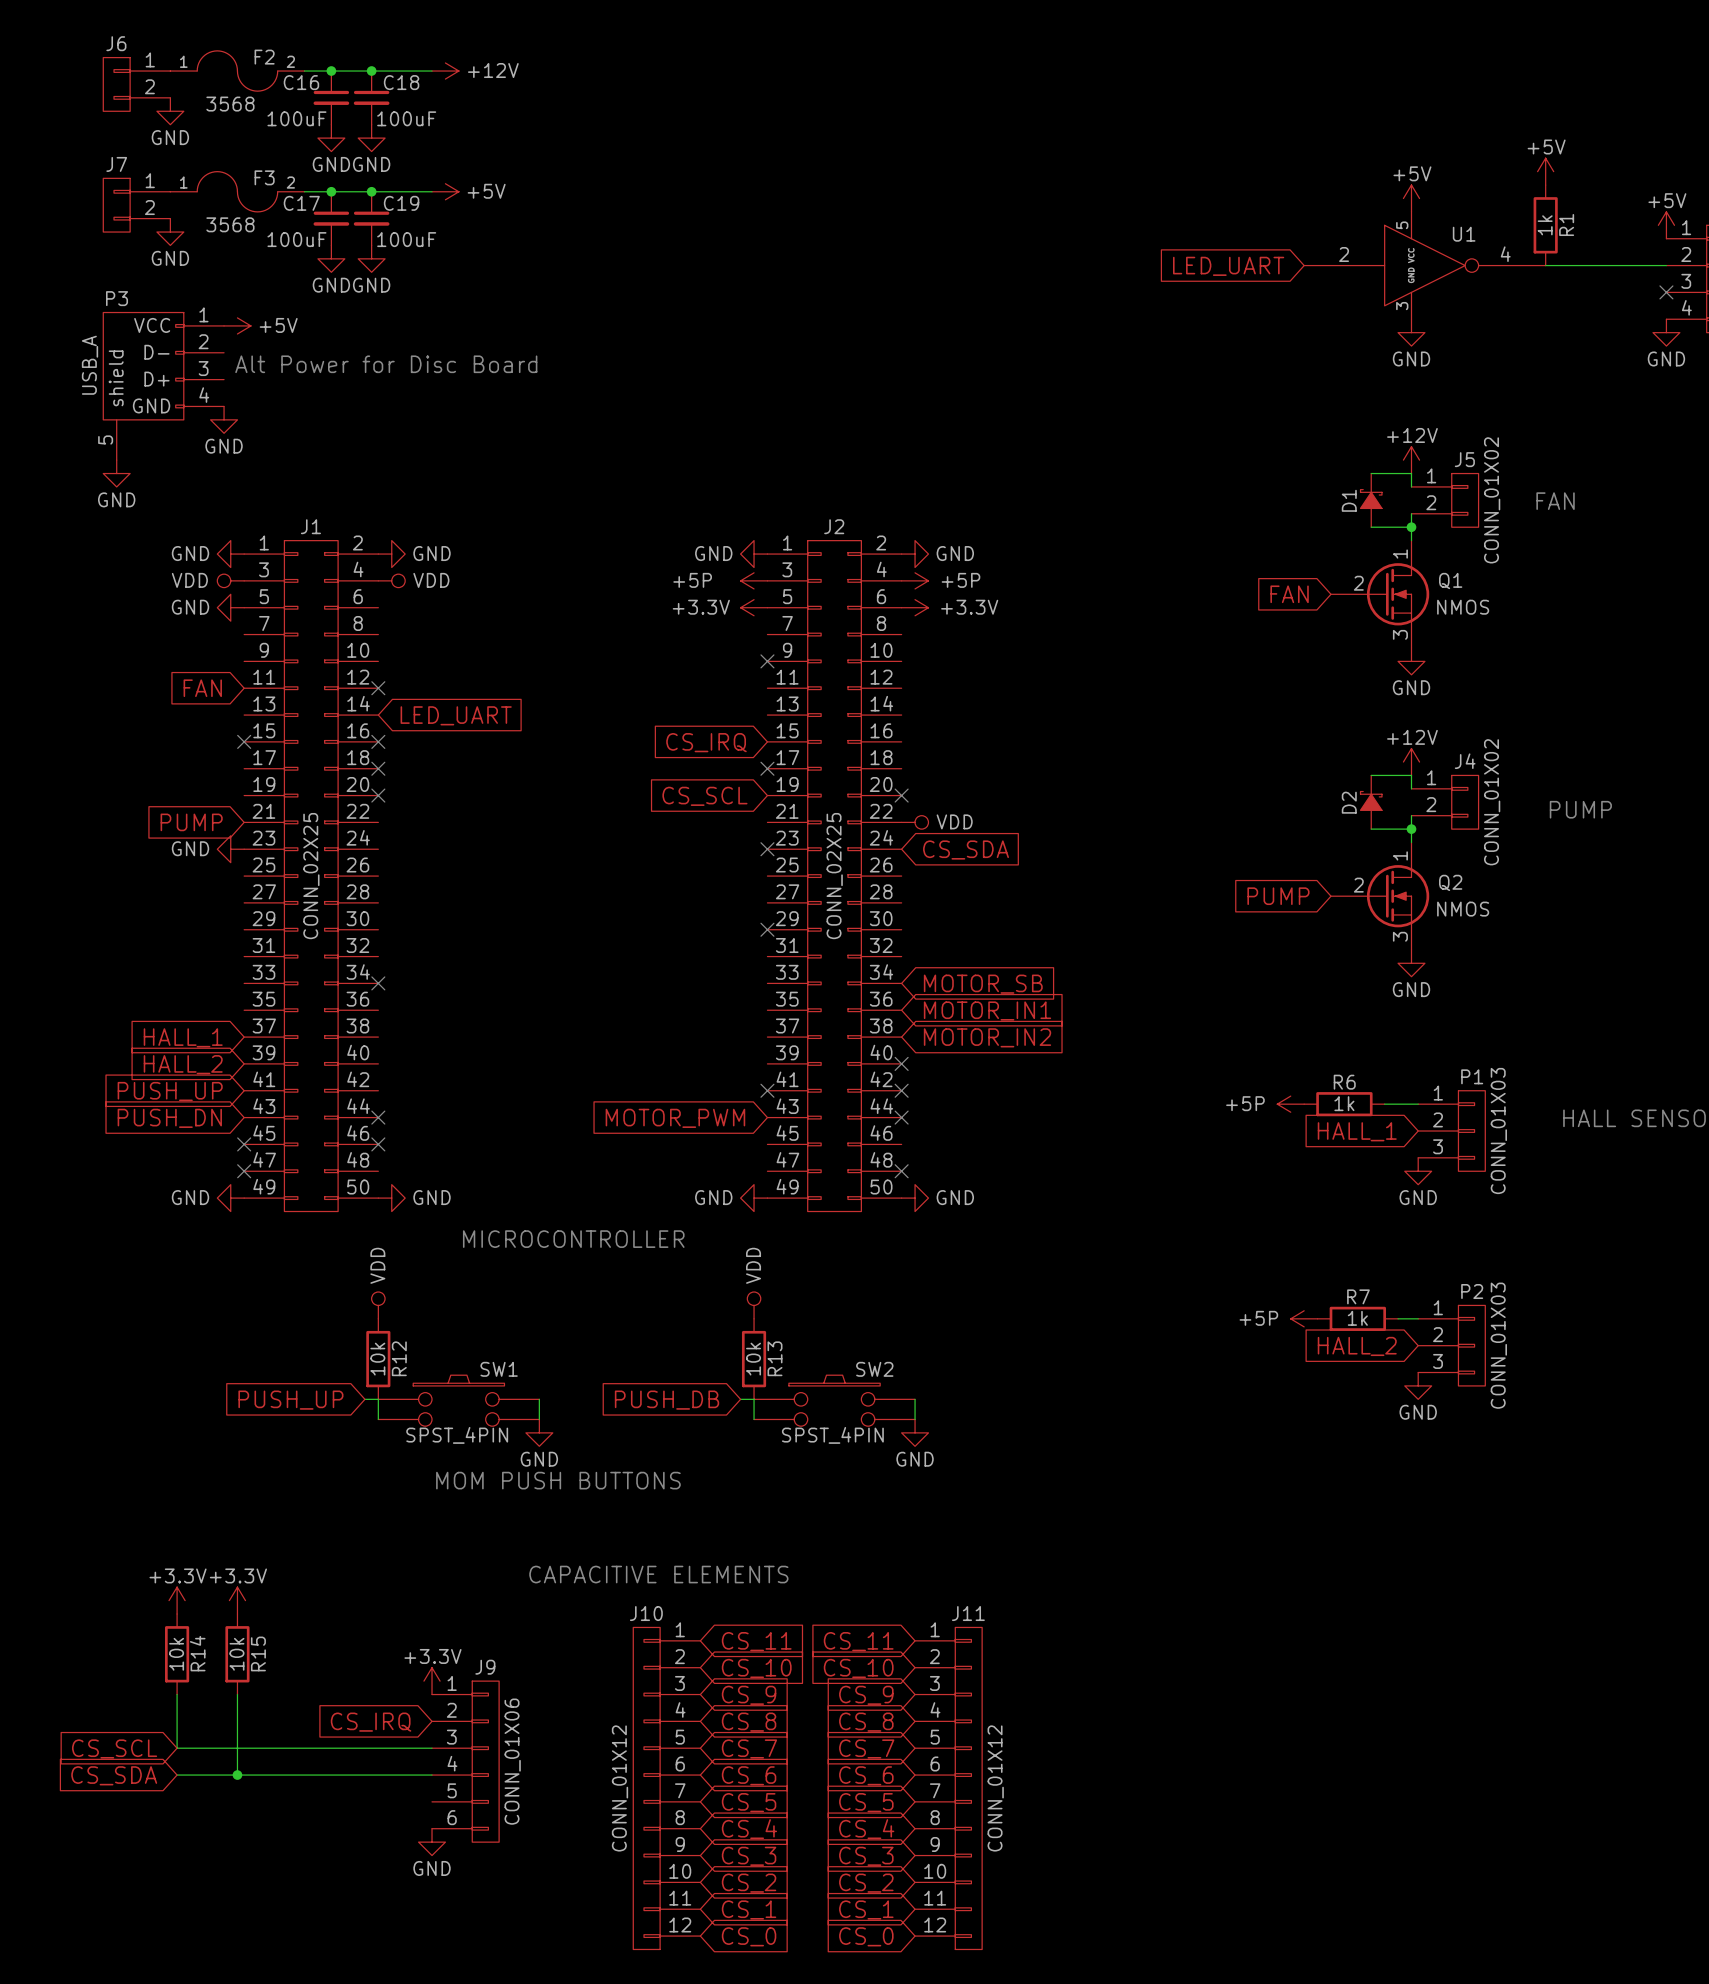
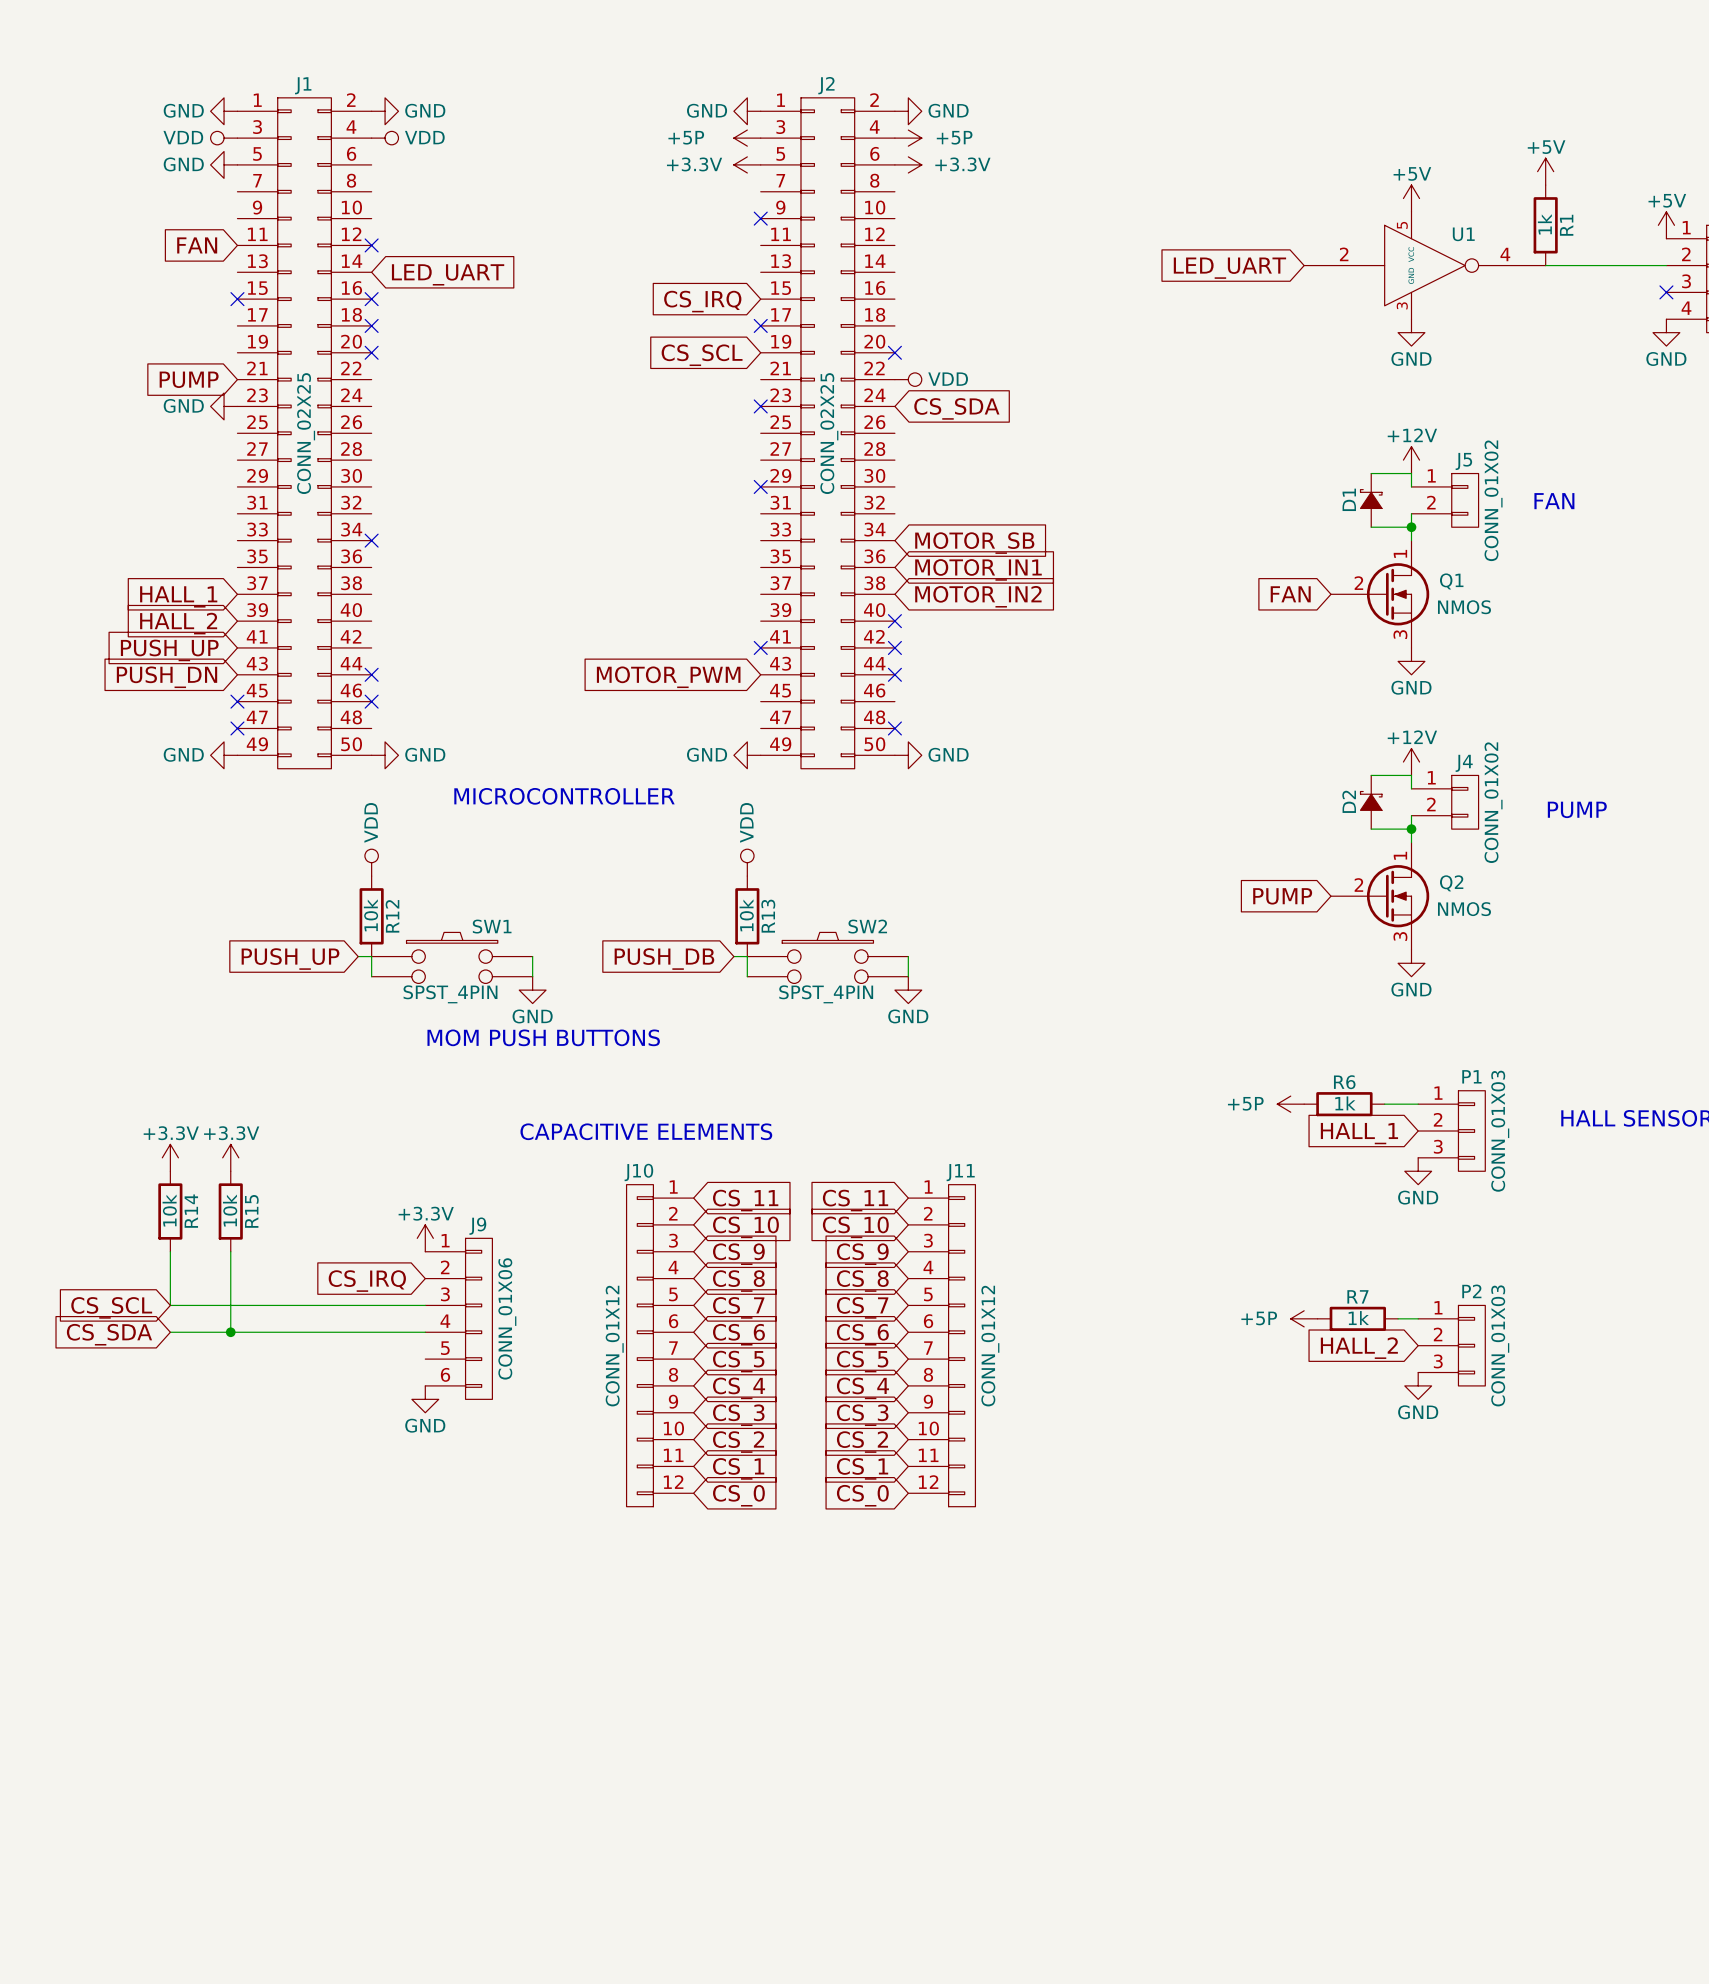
F2: 3568 (237, 71) -> none
wire: (304, 71) (432, 71) -> none
junction: (331, 71) -> none
junction: (371, 71) -> none
power symbol: +12V (445, 71) -> none
J6: (136, 84) -> none
C16: 100uF (331, 97) -> none
C18: 100uF (371, 97) -> none
power symbol: GND (170, 111) -> none
power symbol: none -> GND (224, 111)
power symbol: none -> GND (385, 111)
power symbol: none -> GND (747, 111)
power symbol: none -> GND (908, 111)
power symbol: none -> VDD (224, 138)
power symbol: GND (331, 138) -> none
power symbol: GND (371, 138) -> none
power symbol: none -> VDD (385, 138)
power symbol: none -> +5P (747, 138)
power symbol: none -> +5P (908, 138)
power symbol: none -> GND (224, 164)
power symbol: none -> +3.3V (747, 164)
power symbol: none -> +3.3V (908, 164)
F3: 3568 (237, 191) -> none
wire: (304, 191) (432, 191) -> none
junction: (331, 191) -> none
junction: (371, 191) -> none
power symbol: +5V (445, 191) -> none
J7: (136, 205) -> none
C17: 100uF (331, 218) -> none
C19: 100uF (371, 218) -> none
no-connect mark: none -> (760, 218)
power symbol: GND (170, 232) -> none
global label: none -> FAN (197, 245)
no-connect mark: none -> (371, 245)
power symbol: GND (331, 258) -> none
power symbol: GND (371, 258) -> none
global label: none -> LED_UART (448, 274)
no-connect mark: none -> (237, 299)
no-connect mark: none -> (371, 299)
global label: none -> CS_IRQ (702, 301)
power symbol: +5V (237, 325) -> none
no-connect mark: none -> (371, 325)
no-connect mark: none -> (760, 325)
no-connect mark: none -> (371, 352)
no-connect mark: none -> (894, 352)
global label: none -> CS_SCL (702, 355)
text: Alt Power for Disc Board (386, 364) -> none
global label: none -> PUMP (189, 379)
power symbol: none -> VDD (908, 379)
P3: USB_A (163, 386) -> none
no-connect mark: none -> (760, 406)
global label: none -> CS_SDA (956, 408)
power symbol rotation: 0° (224, 419) -> 90° clockwise (224, 406)
power symbol: GND (116, 473) -> none
no-connect mark: none -> (760, 486)
no-connect mark: none -> (371, 540)
global label: none -> MOTOR_SB (974, 543)
power symbol: GND (230, 554) -> none
power symbol: GND (391, 554) -> none
power symbol: GND (754, 554) -> none
power symbol: GND (915, 554) -> none
global label: none -> MOTOR_IN1 (978, 569)
power symbol: VDD (230, 580) -> none
power symbol: VDD (391, 580) -> none
power symbol: +5P (754, 580) -> none
power symbol: +5P (915, 580) -> none
global label: none -> HALL_1 (178, 596)
global label: none -> MOTOR_IN2 (978, 596)
power symbol: GND (230, 607) -> none
power symbol: +3.3V (754, 607) -> none
power symbol: +3.3V (915, 607) -> none
global label: none -> HALL_2 (178, 623)
no-connect mark: none -> (894, 621)
no-connect mark: none -> (894, 647)
global label: none -> PUSH_UP (169, 650)
no-connect mark position: (767, 661) -> (760, 647)
no-connect mark: none -> (371, 674)
no-connect mark: none -> (894, 674)
global label: none -> PUSH_DN (167, 677)
global label: none -> MOTOR_PWM (668, 677)
global label: FAN (202, 688) -> none
no-connect mark: (378, 688) -> none
no-connect mark: none -> (237, 701)
no-connect mark: none -> (371, 701)
global label: LED_UART (456, 715) -> none
no-connect mark: none -> (894, 728)
no-connect mark position: (244, 741) -> (237, 728)
no-connect mark: (378, 741) -> none
global label: CS_IRQ (706, 742) -> none
power symbol: none -> GND (224, 755)
power symbol: none -> GND (385, 755)
power symbol: none -> GND (747, 755)
power symbol: none -> GND (908, 755)
no-connect mark: (378, 768) -> none
no-connect mark: (767, 768) -> none
no-connect mark: (378, 795) -> none
no-connect mark: (901, 795) -> none
text: none -> MICROCONTROLLER (564, 796)
global label: CS_SCL (704, 796) -> none
global label: PUMP (191, 822) -> none
power symbol rotation: 0° (915, 822) -> 90° counterclockwise (747, 862)
power symbol position: VDD (915, 822) -> VDD (747, 862)
power symbol: GND (230, 849) -> none
no-connect mark: (767, 849) -> none
global label: CS_SDA (966, 850) -> none
power symbol: none -> VDD (371, 862)
J1 position: (311, 876) -> (304, 433)
J2 position: (834, 876) -> (827, 433)
no-connect mark: (767, 929) -> none
wire: none -> (358, 956) (371, 956) (371, 976)
wire: none -> (532, 956) (532, 976)
wire: none -> (733, 956) (747, 956) (747, 976)
wire: none -> (908, 956) (908, 976)
global label: none -> PUSH_DB (664, 959)
no-connect mark: (378, 983) -> none
global label: MOTOR_SB (983, 984) -> none
power symbol: none -> GND (532, 990)
power symbol: none -> GND (908, 990)
global label: MOTOR_IN1 (987, 1011) -> none
global label: HALL_1 (183, 1037) -> none
text: none -> MOM PUSH BUTTONS (543, 1037)
global label: MOTOR_IN2 (987, 1037) -> none
no-connect mark: (901, 1063) -> none
global label: HALL_2 (183, 1064) -> none
no-connect mark: (767, 1090) -> none
no-connect mark: (901, 1090) -> none
global label position: PUSH_UP (170, 1091) -> PUSH_UP (290, 959)
no-connect mark: (378, 1117) -> none
no-connect mark: (901, 1117) -> none
global label: PUSH_DN (169, 1118) -> none
global label: MOTOR_PWM (675, 1118) -> none
text: none -> CAPACITIVE ELEMENTS (646, 1131)
no-connect mark: (244, 1144) -> none
no-connect mark: (378, 1144) -> none
power symbol: none -> +3.3V (170, 1157)
power symbol: none -> +3.3V (230, 1157)
no-connect mark: (244, 1171) -> none
no-connect mark: (901, 1171) -> none
power symbol: GND (230, 1198) -> none
power symbol: GND (391, 1198) -> none
global label: none -> CS_11 (745, 1200)
power symbol: GND (754, 1198) -> none
global label: none -> CS_11 (855, 1200)
power symbol: GND (915, 1198) -> none
global label: none -> CS_10 (745, 1227)
global label: none -> CS_10 (855, 1227)
power symbol: none -> +3.3V (425, 1238)
text: MICROCONTROLLER (573, 1239) -> none
wire: none -> (170, 1251) (170, 1305) (425, 1305)
wire: none -> (230, 1251) (230, 1332)
global label: none -> CS_9 (738, 1254)
global label: none -> CS_9 (862, 1254)
global label: none -> CS_IRQ (367, 1281)
global label: none -> CS_8 (738, 1281)
global label: none -> CS_8 (862, 1281)
power symbol: VDD (378, 1305) -> none
power symbol: VDD (754, 1305) -> none
global label: none -> CS_SCL (111, 1307)
global label: none -> CS_7 (738, 1307)
global label: none -> CS_7 (862, 1307)
wire: none -> (170, 1332) (425, 1332)
junction: none -> (230, 1332)
global label: none -> CS_SDA (109, 1334)
global label: none -> CS_6 (738, 1334)
global label: none -> CS_6 (862, 1334)
R12 position: (378, 1359) -> (371, 916)
global label: none -> CS_5 (738, 1361)
R13 position: (754, 1359) -> (747, 916)
global label: none -> CS_5 (862, 1361)
global label: none -> CS_4 (739, 1388)
global label: none -> CS_4 (862, 1388)
wire: (364, 1399) (378, 1399) (378, 1419) -> none
power symbol: none -> GND (425, 1399)
wire: (539, 1399) (539, 1419) -> none
wire: (740, 1399) (754, 1399) (754, 1419) -> none
wire: (915, 1399) (915, 1419) -> none
global label: PUSH_UP (290, 1400) -> none
SW1 position: (458, 1400) -> (452, 957)
global label: PUSH_DB (667, 1400) -> none
SW2 position: (834, 1400) -> (827, 957)
global label: none -> CS_3 (738, 1415)
global label: none -> CS_3 (862, 1415)
power symbol: GND (539, 1432) -> none
power symbol: GND (915, 1432) -> none
global label: none -> CS_2 (738, 1442)
global label: none -> CS_2 (862, 1442)
global label: none -> CS_1 (738, 1468)
global label: none -> CS_1 (862, 1468)
text: MOM PUSH BUTTONS (558, 1480) -> none
global label: none -> CS_0 (738, 1495)
global label: none -> CS_0 (862, 1495)
text: CAPACITIVE ELEMENTS (658, 1574) -> none
power symbol: +3.3V (177, 1600) -> none
power symbol: +3.3V (237, 1600) -> none
global label: CS_11 (756, 1641) -> none
global label: CS_11 (858, 1641) -> none
R14 position: (177, 1654) -> (170, 1211)
R15 position: (237, 1654) -> (230, 1211)
global label: CS_10 (756, 1668) -> none
global label: CS_10 (858, 1668) -> none
power symbol: +3.3V (432, 1681) -> none
wire: (177, 1694) (177, 1748) (432, 1748) -> none
wire: (237, 1694) (237, 1775) -> none
global label: CS_9 (749, 1695) -> none
global label: CS_9 (866, 1695) -> none
global label: CS_IRQ (371, 1722) -> none
global label: CS_8 (749, 1722) -> none
global label: CS_8 (866, 1722) -> none
global label: CS_SCL (114, 1748) -> none
global label: CS_7 (749, 1748) -> none
global label: CS_7 (866, 1748) -> none
J9 position: (465, 1761) -> (458, 1318)
global label: CS_SDA (114, 1775) -> none
wire: (177, 1775) (432, 1775) -> none
junction: (237, 1775) -> none
global label: CS_6 (749, 1775) -> none
global label: CS_6 (866, 1775) -> none
J10 position: (666, 1788) -> (660, 1345)
J11 position: (948, 1788) -> (941, 1345)
global label: CS_5 (749, 1802) -> none
global label: CS_5 (866, 1802) -> none
global label: CS_4 (749, 1829) -> none
global label: CS_4 (866, 1829) -> none
power symbol: GND (432, 1842) -> none
global label: CS_3 (749, 1856) -> none
global label: CS_3 (866, 1856) -> none
global label: CS_2 (749, 1883) -> none
global label: CS_2 (866, 1883) -> none
global label: CS_1 (749, 1909) -> none
global label: CS_1 (866, 1909) -> none
global label: CS_0 (749, 1936) -> none
global label: CS_0 (866, 1936) -> none

